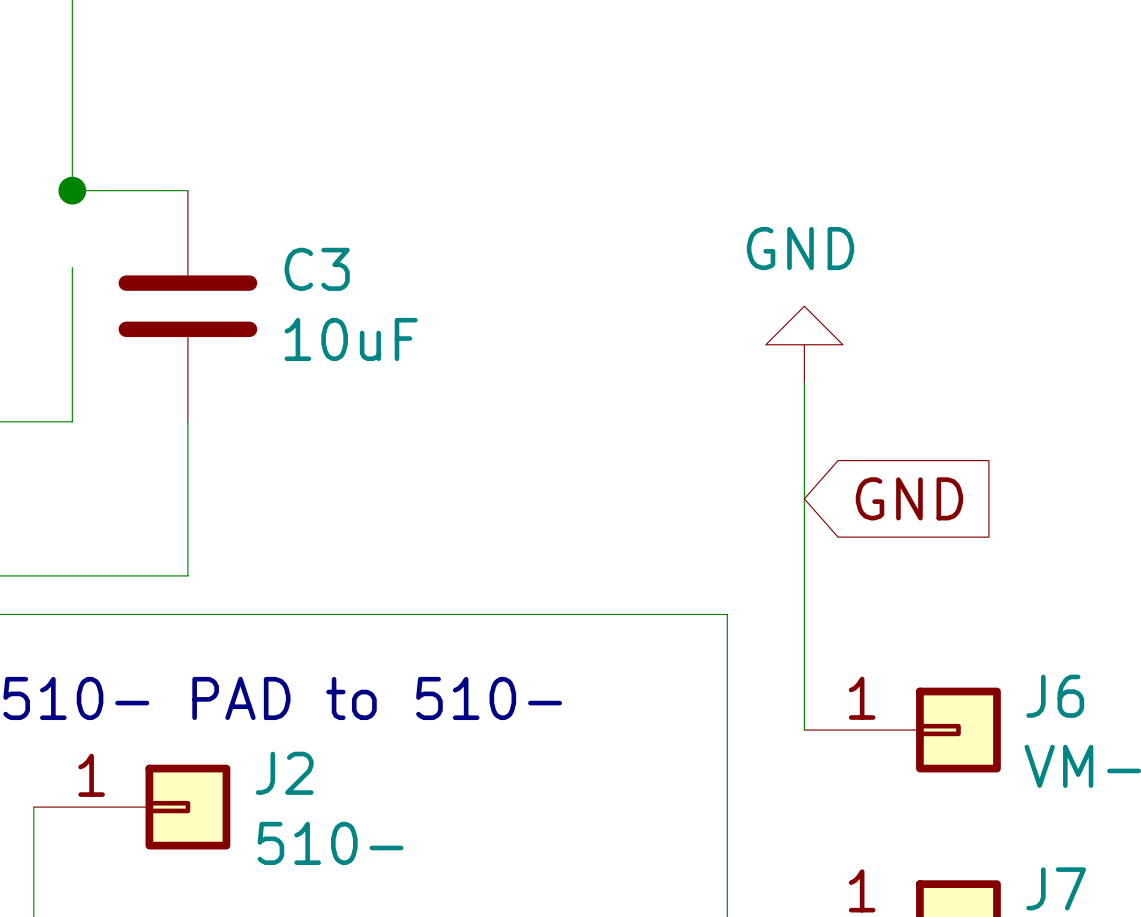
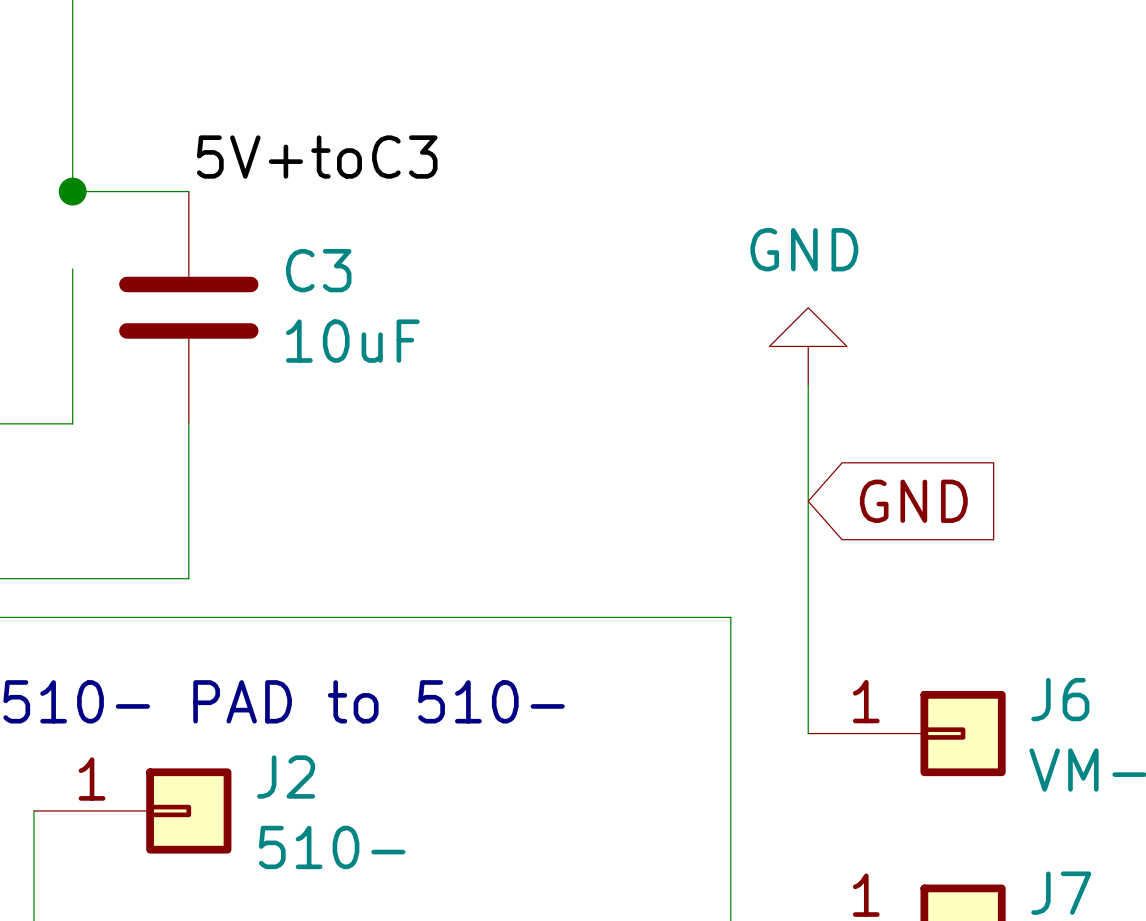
label: none -> 5V+toC3 (317, 157)

